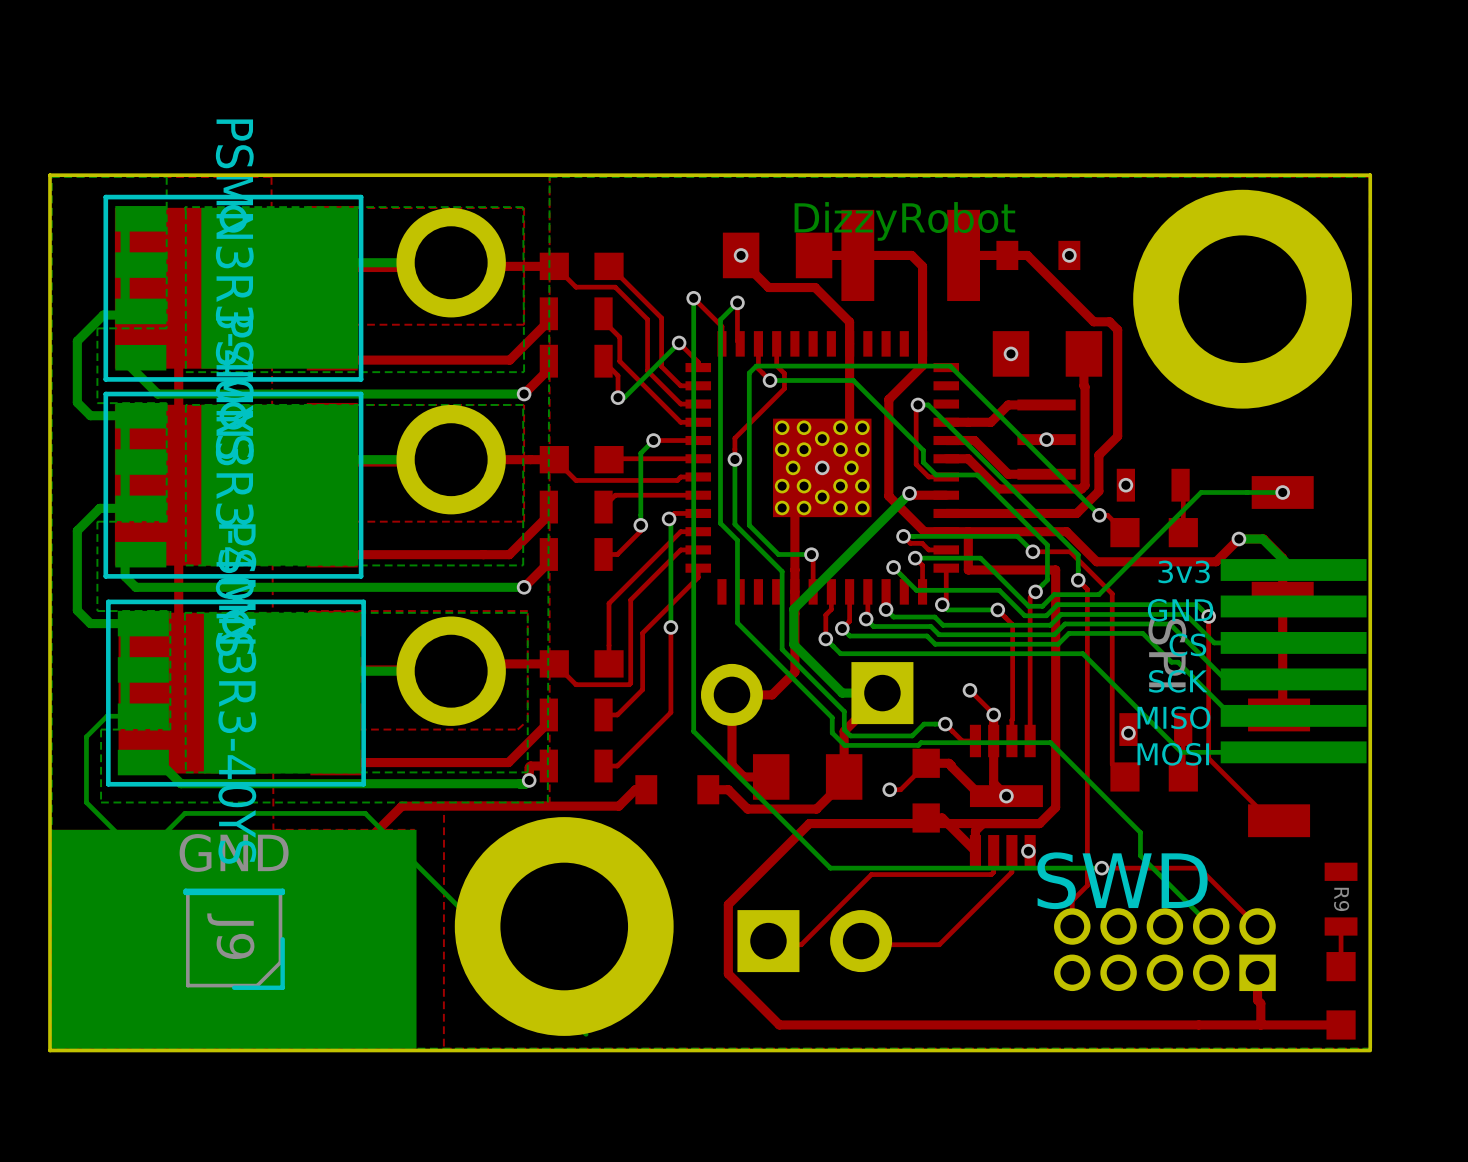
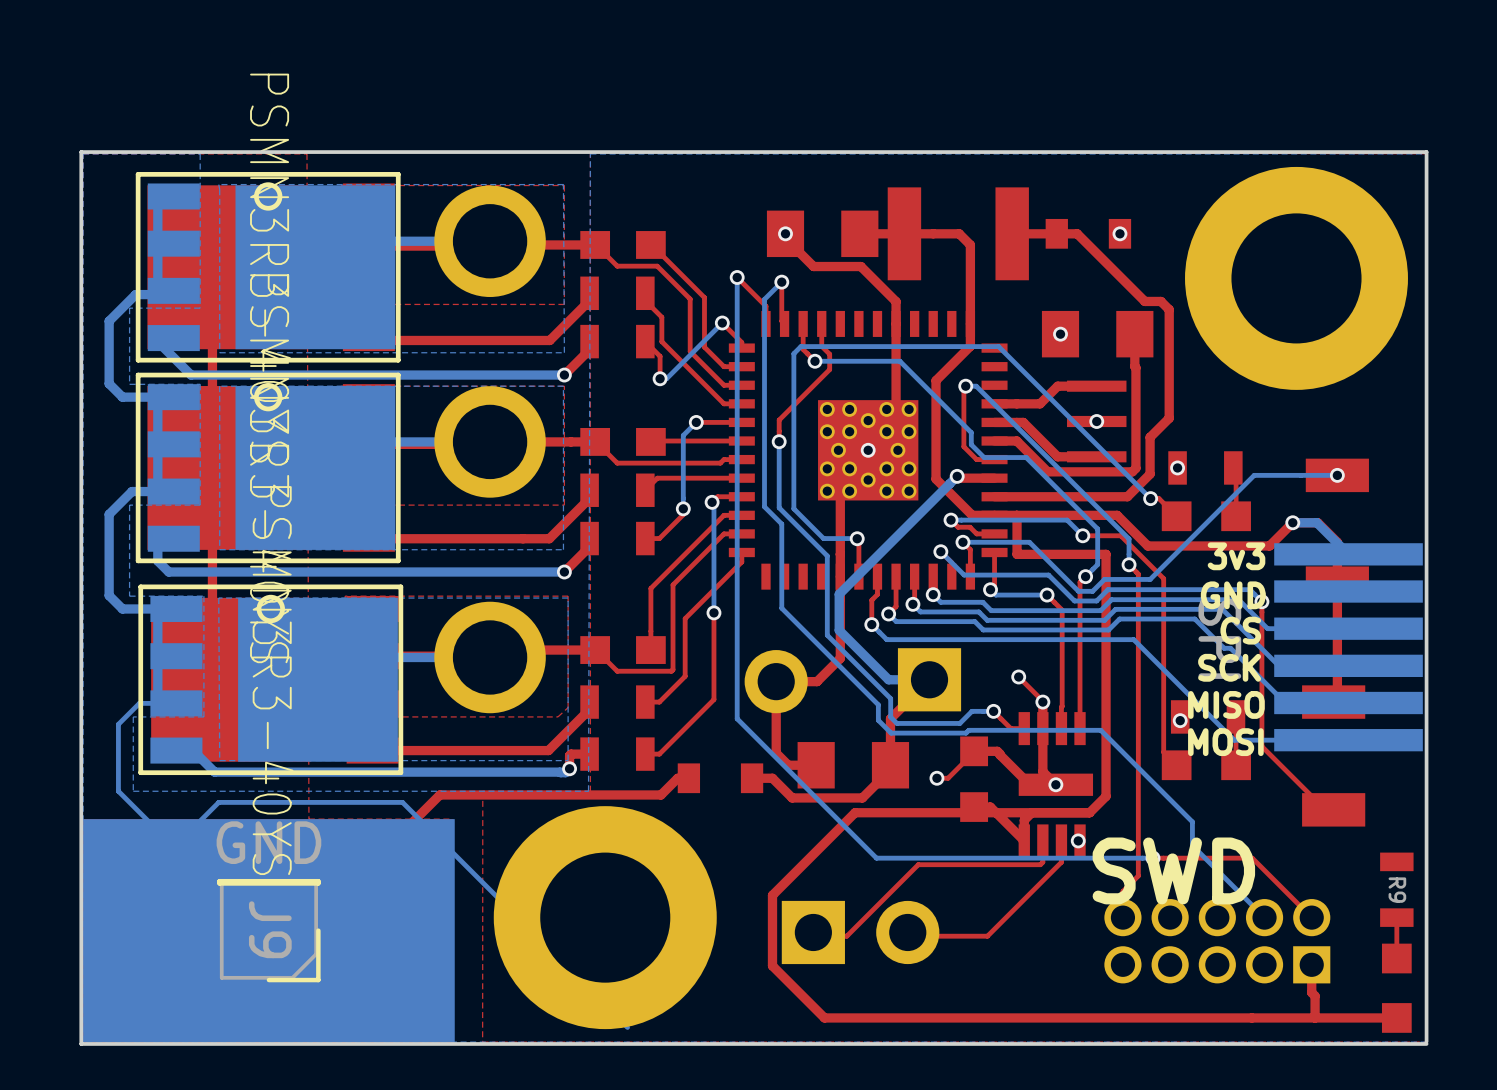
text: DizzyRobot (904, 221) -> none

